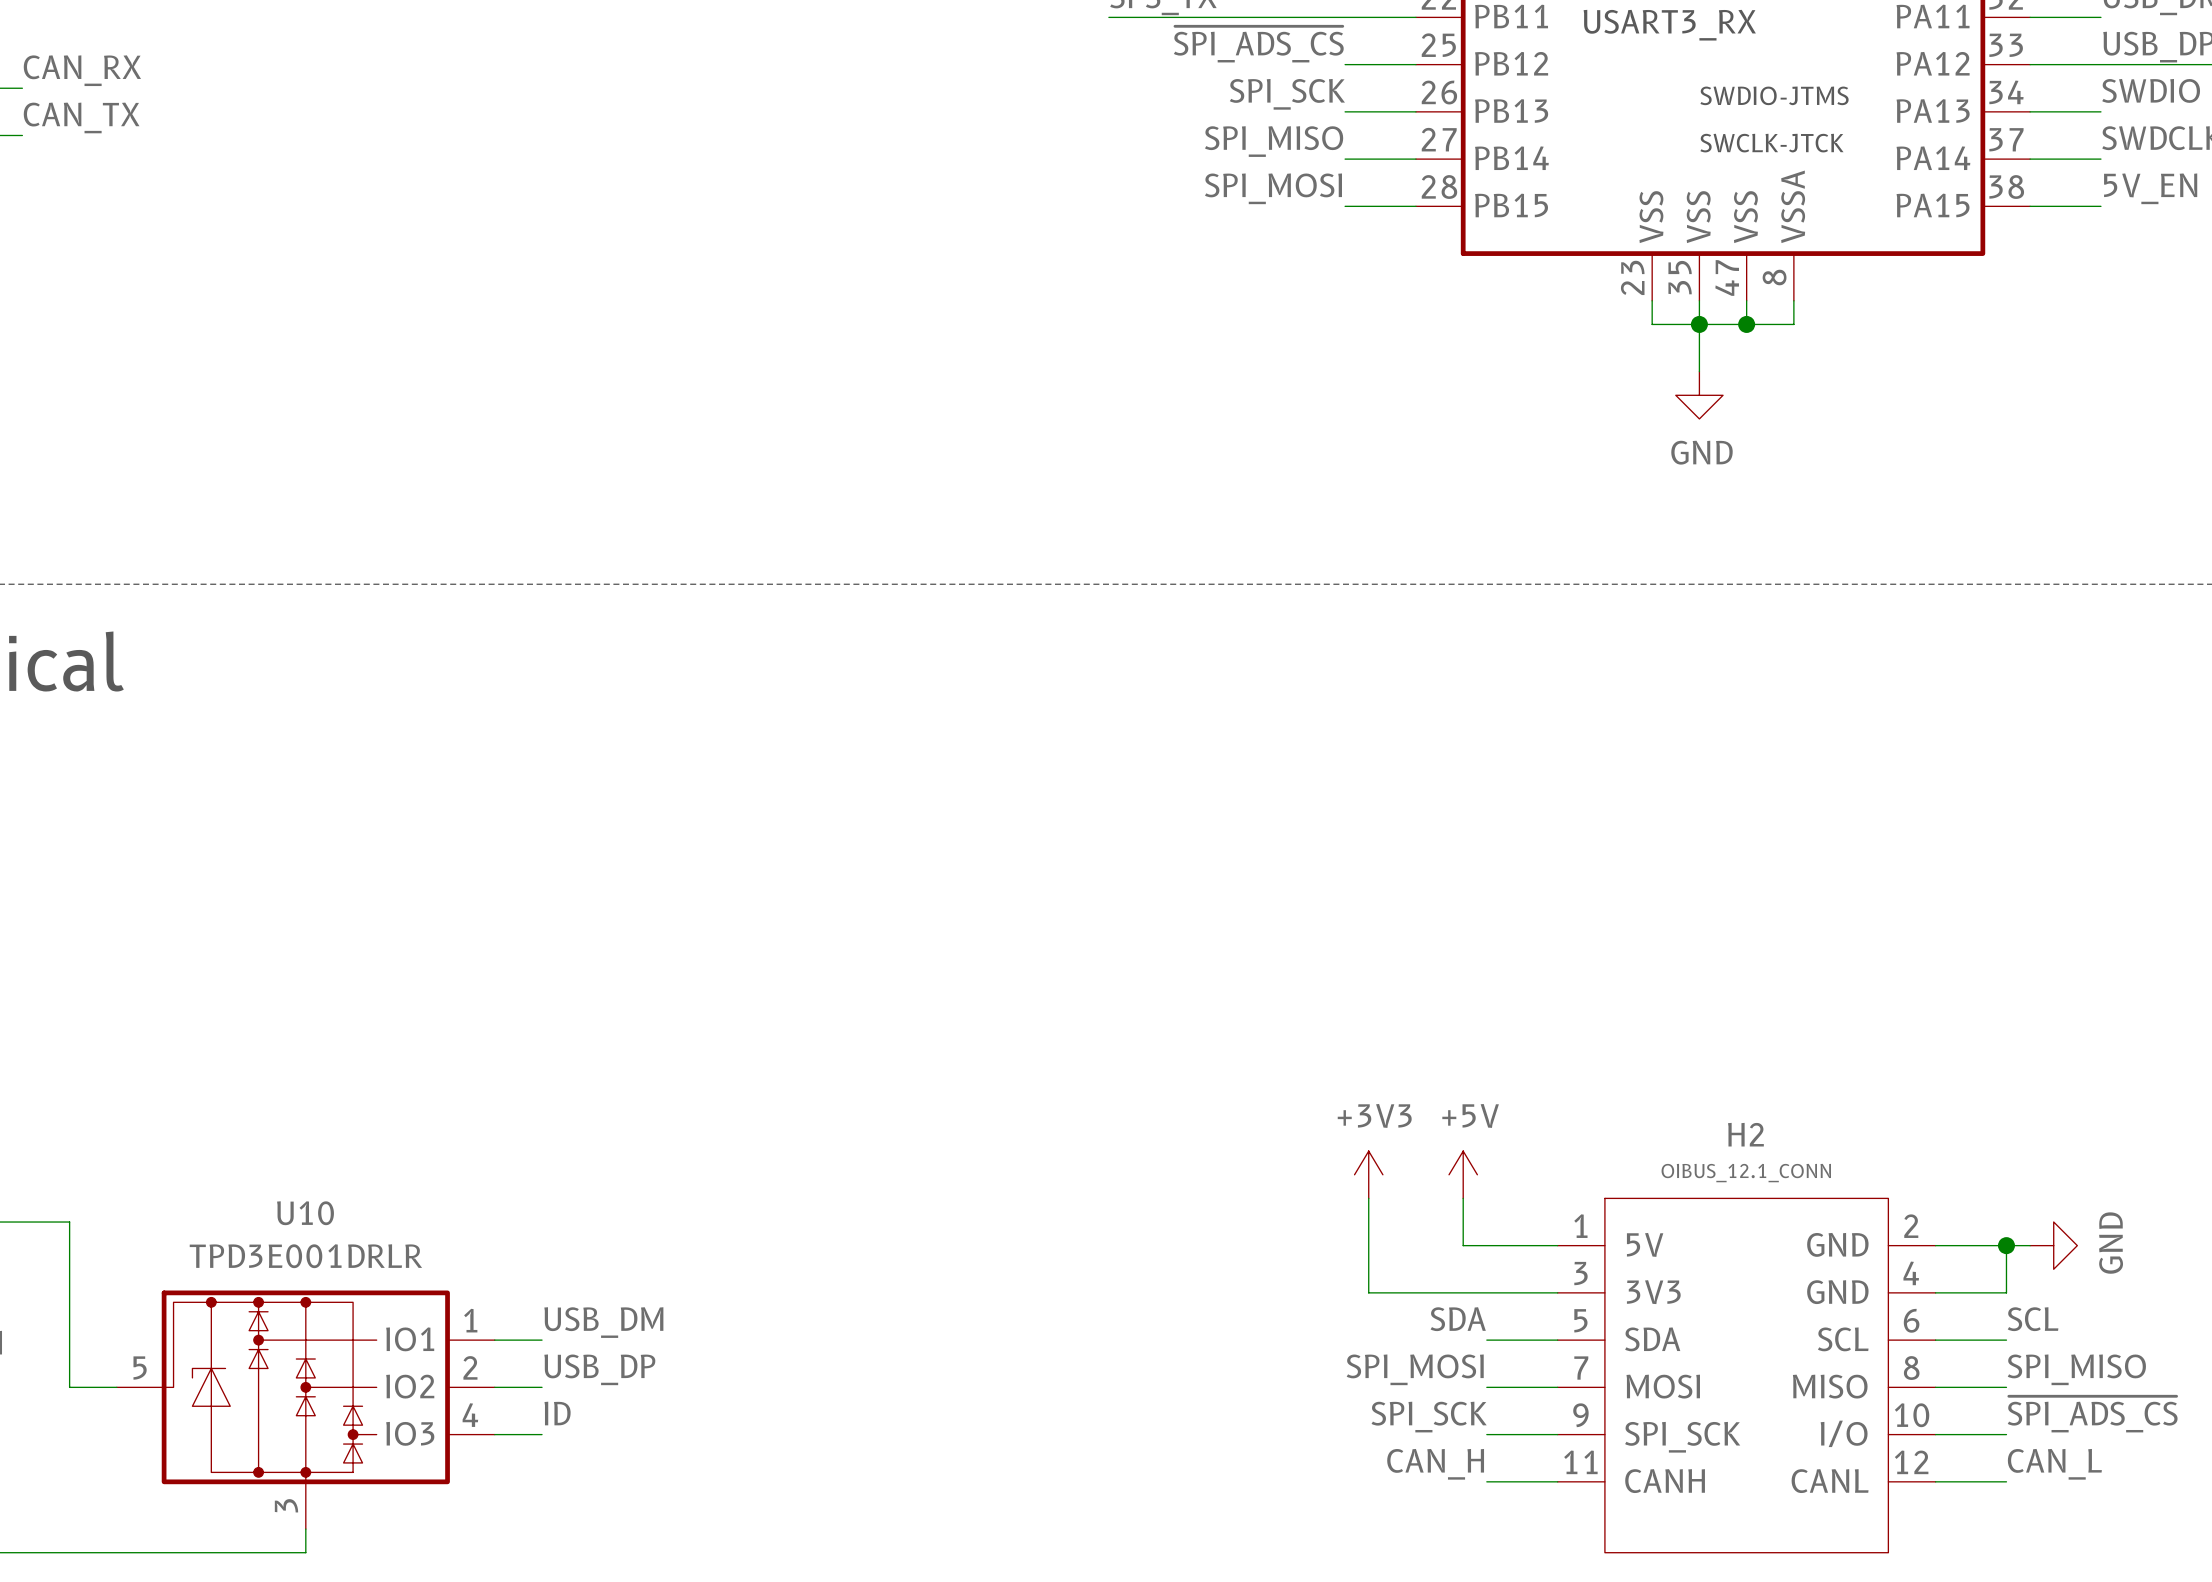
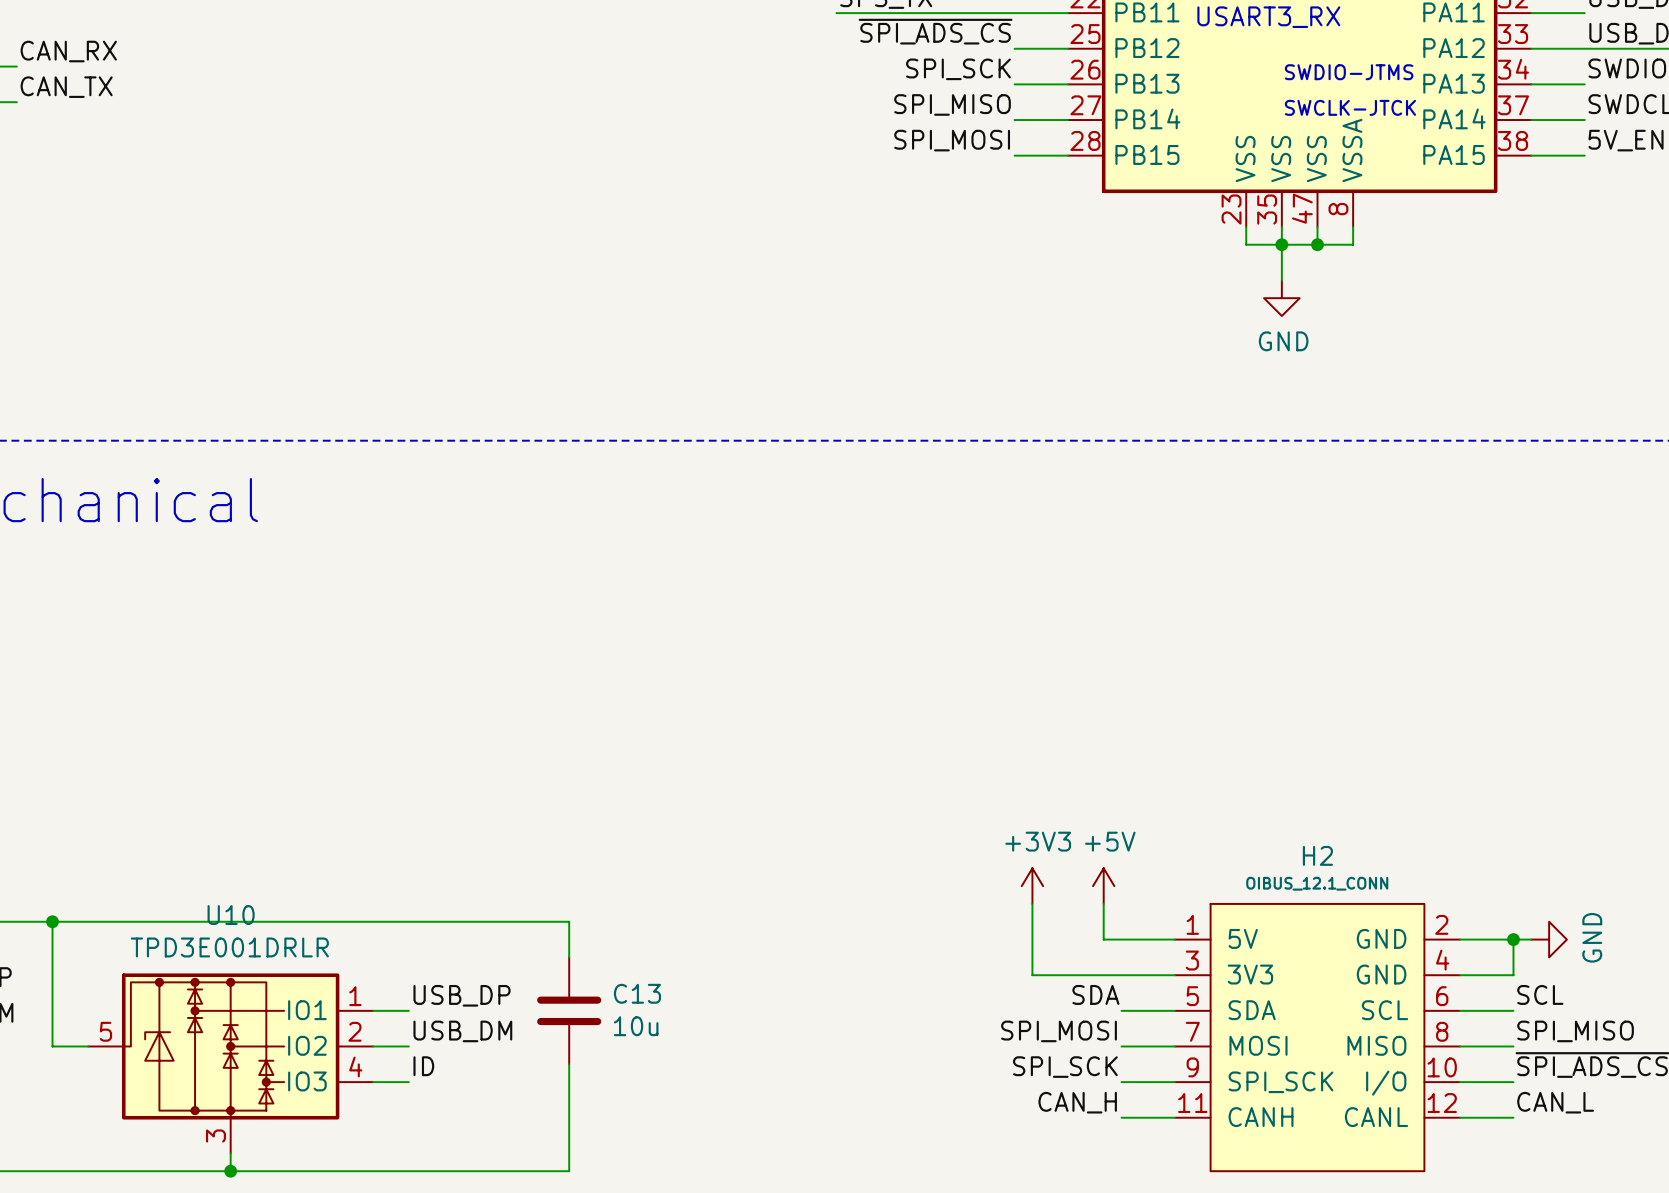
wire: none -> (52, 921) (569, 921) (569, 957)
junction: none -> (52, 921)
label: USB_DM (603, 1322) -> USB_DP (462, 995)
C13: none -> 10u (569, 1010)
label: USB_DP (599, 1369) -> USB_DM (462, 1031)
wire: none -> (569, 1064) (569, 1171) (230, 1171)
junction: none -> (230, 1171)

